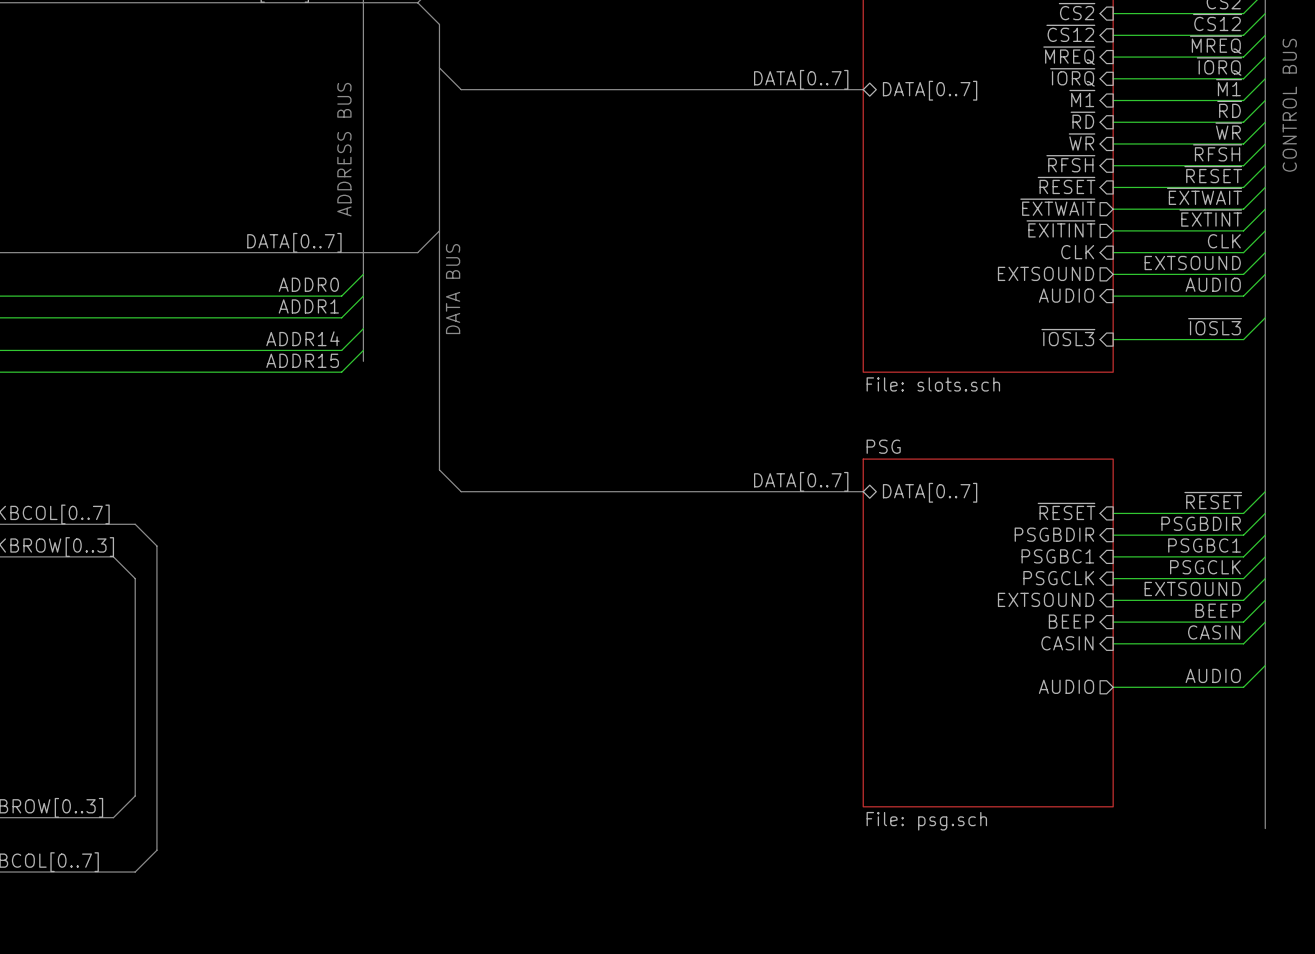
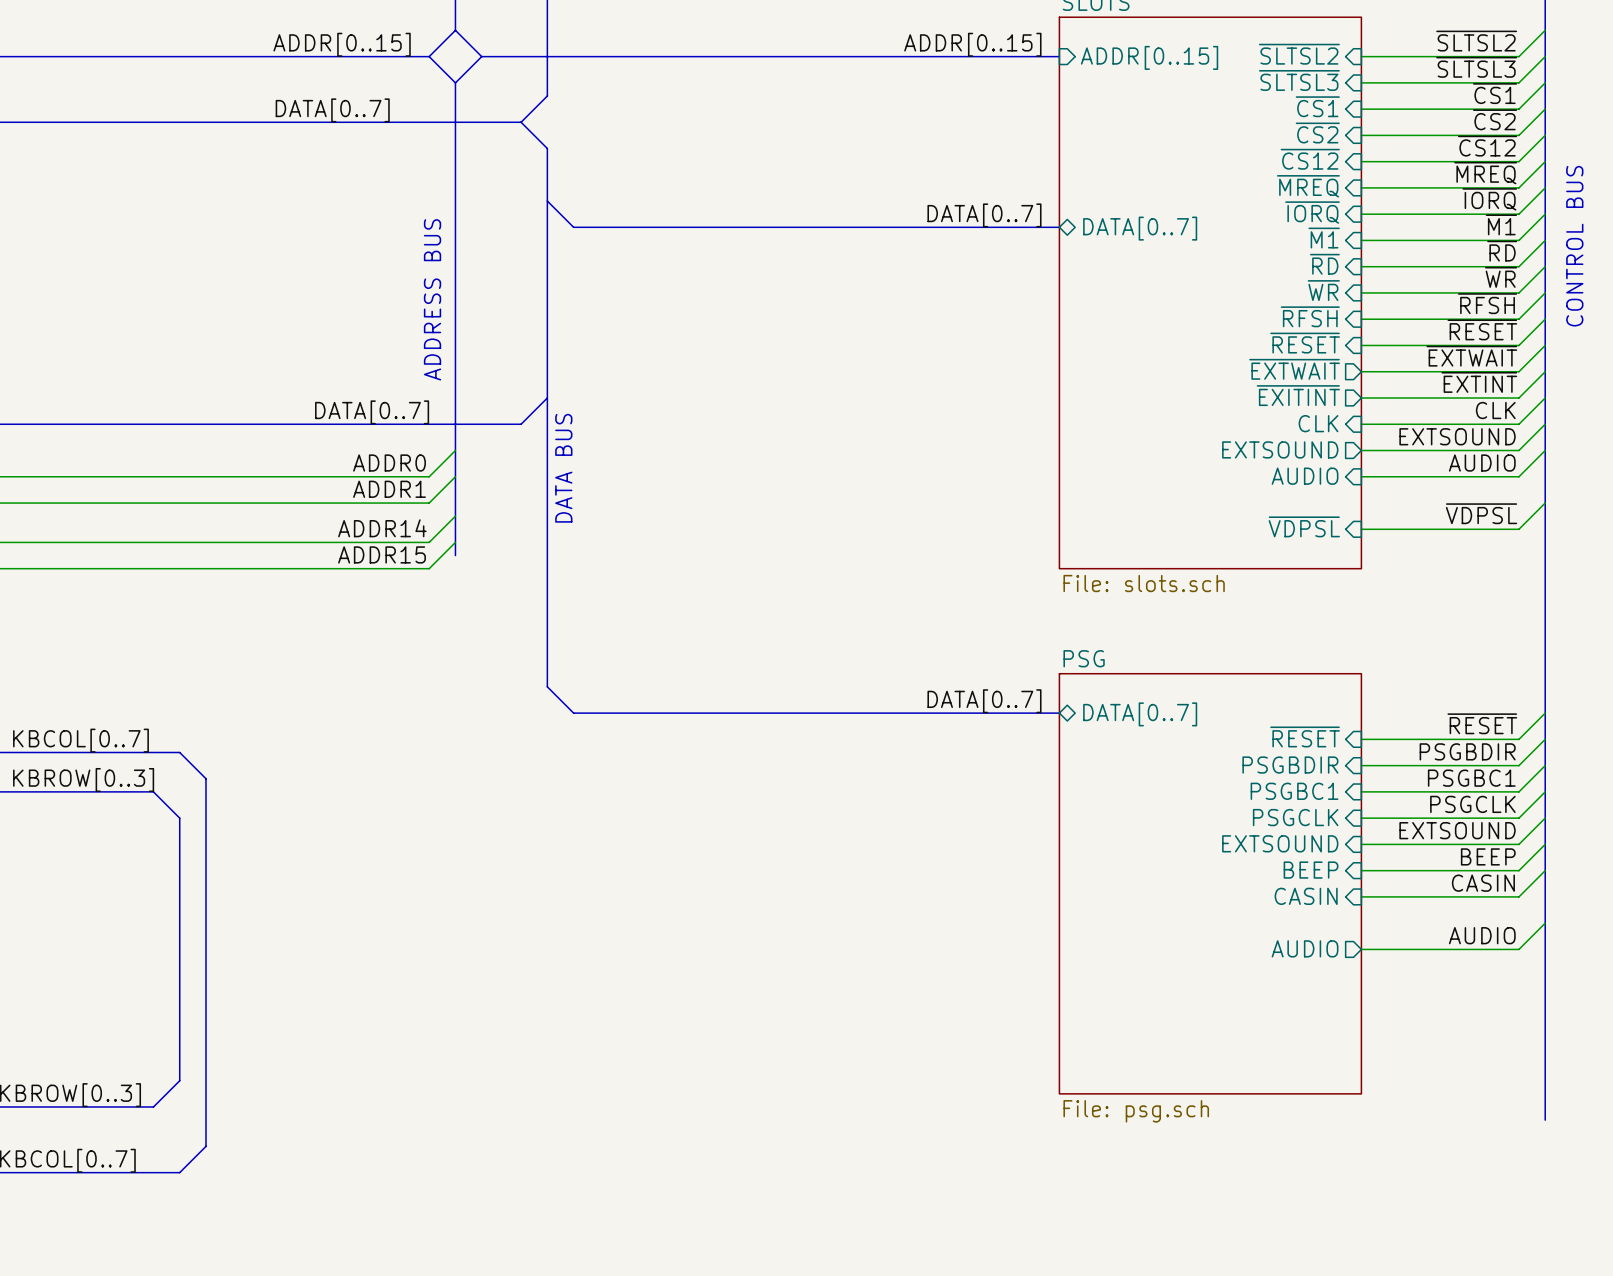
label: ~{IOSL3} (1215, 326) -> ~{VDPSL} (1481, 513)
sheet pin: ~{IOSL3} (1068, 337) -> ~{VDPSL} (1304, 526)

